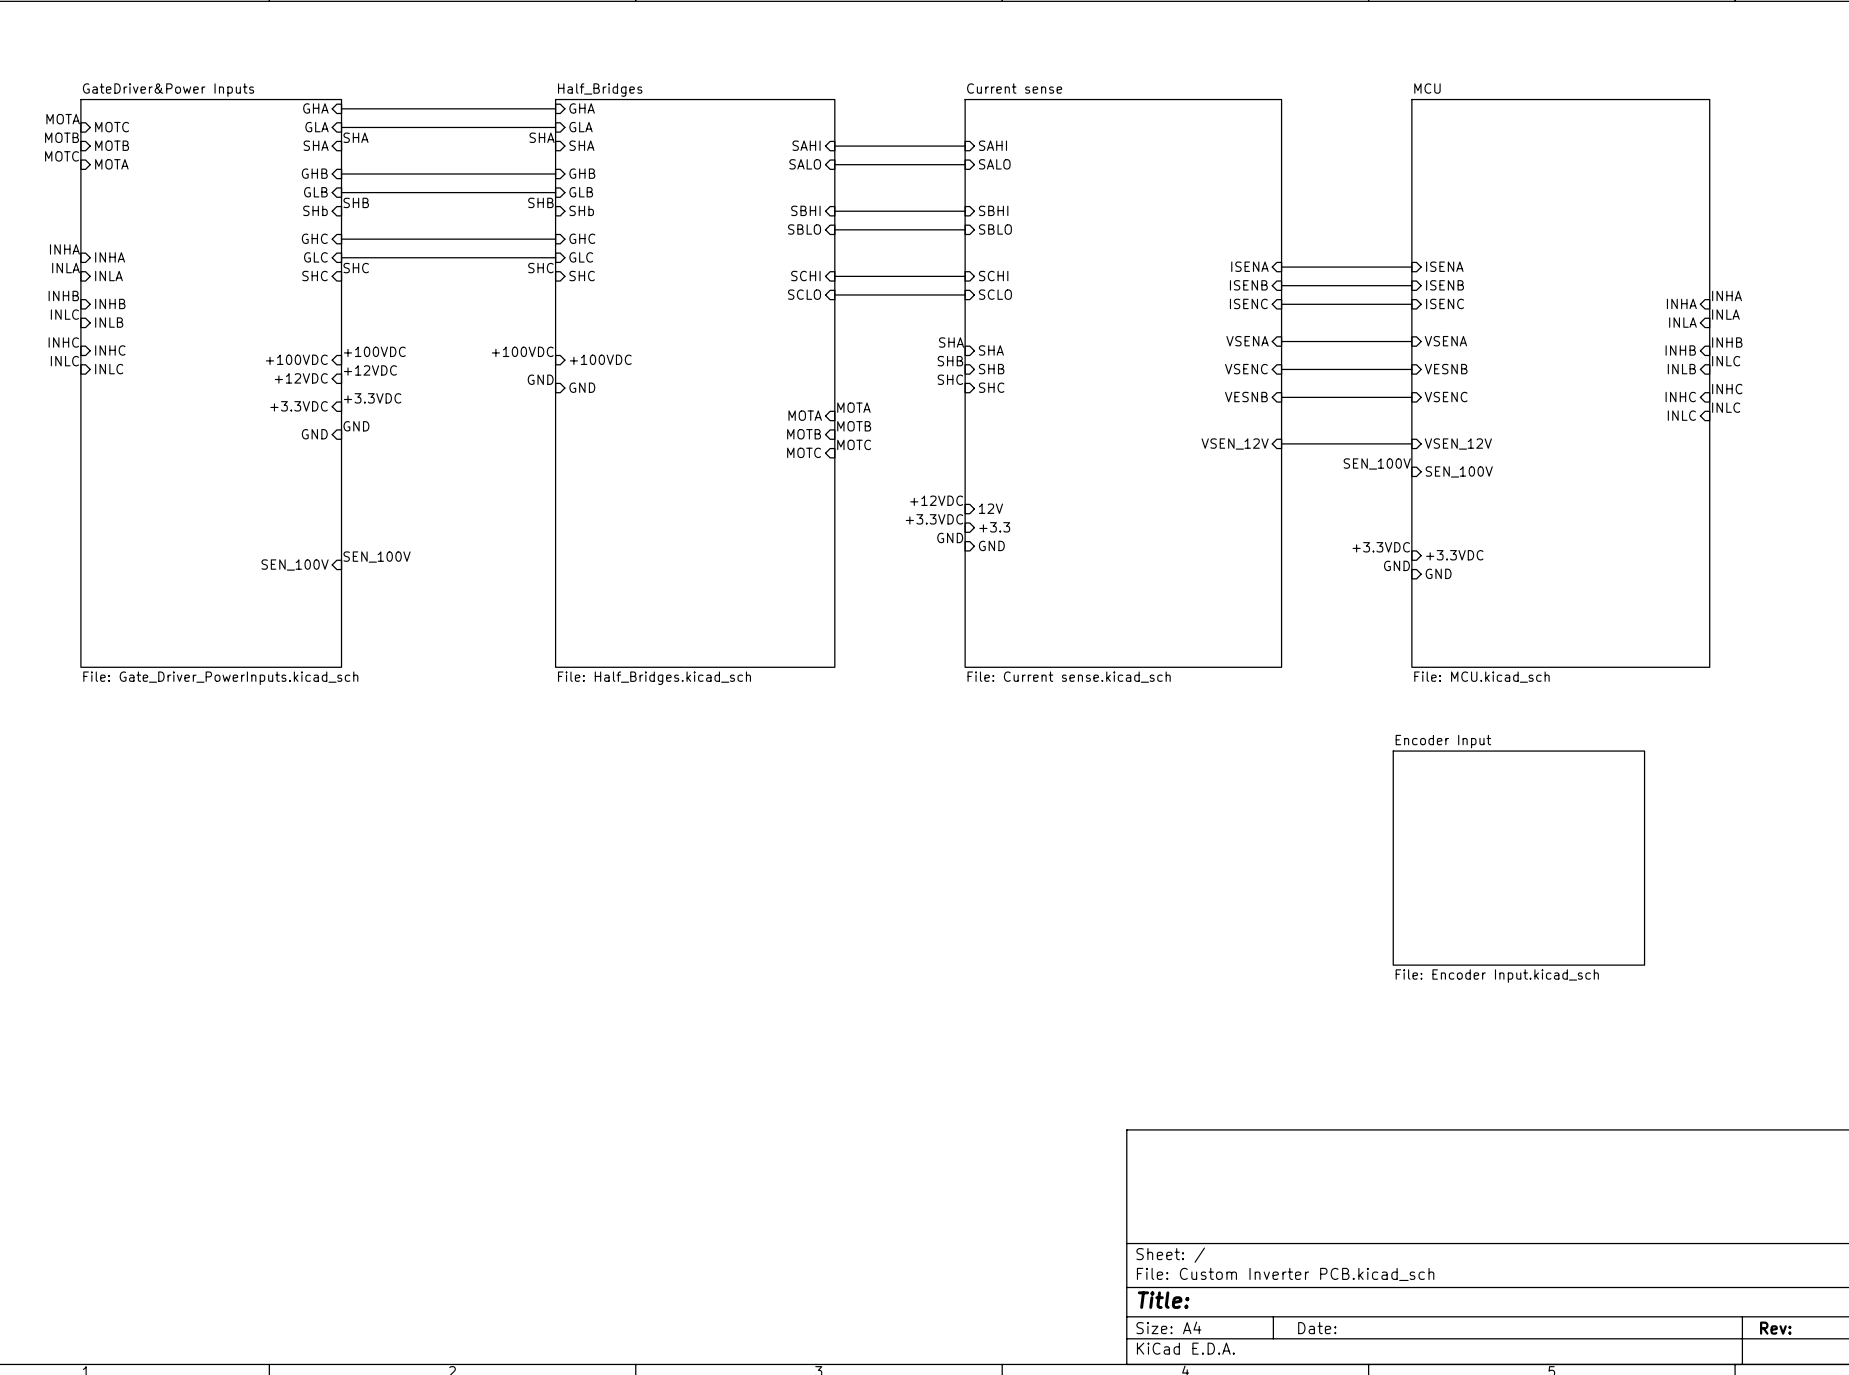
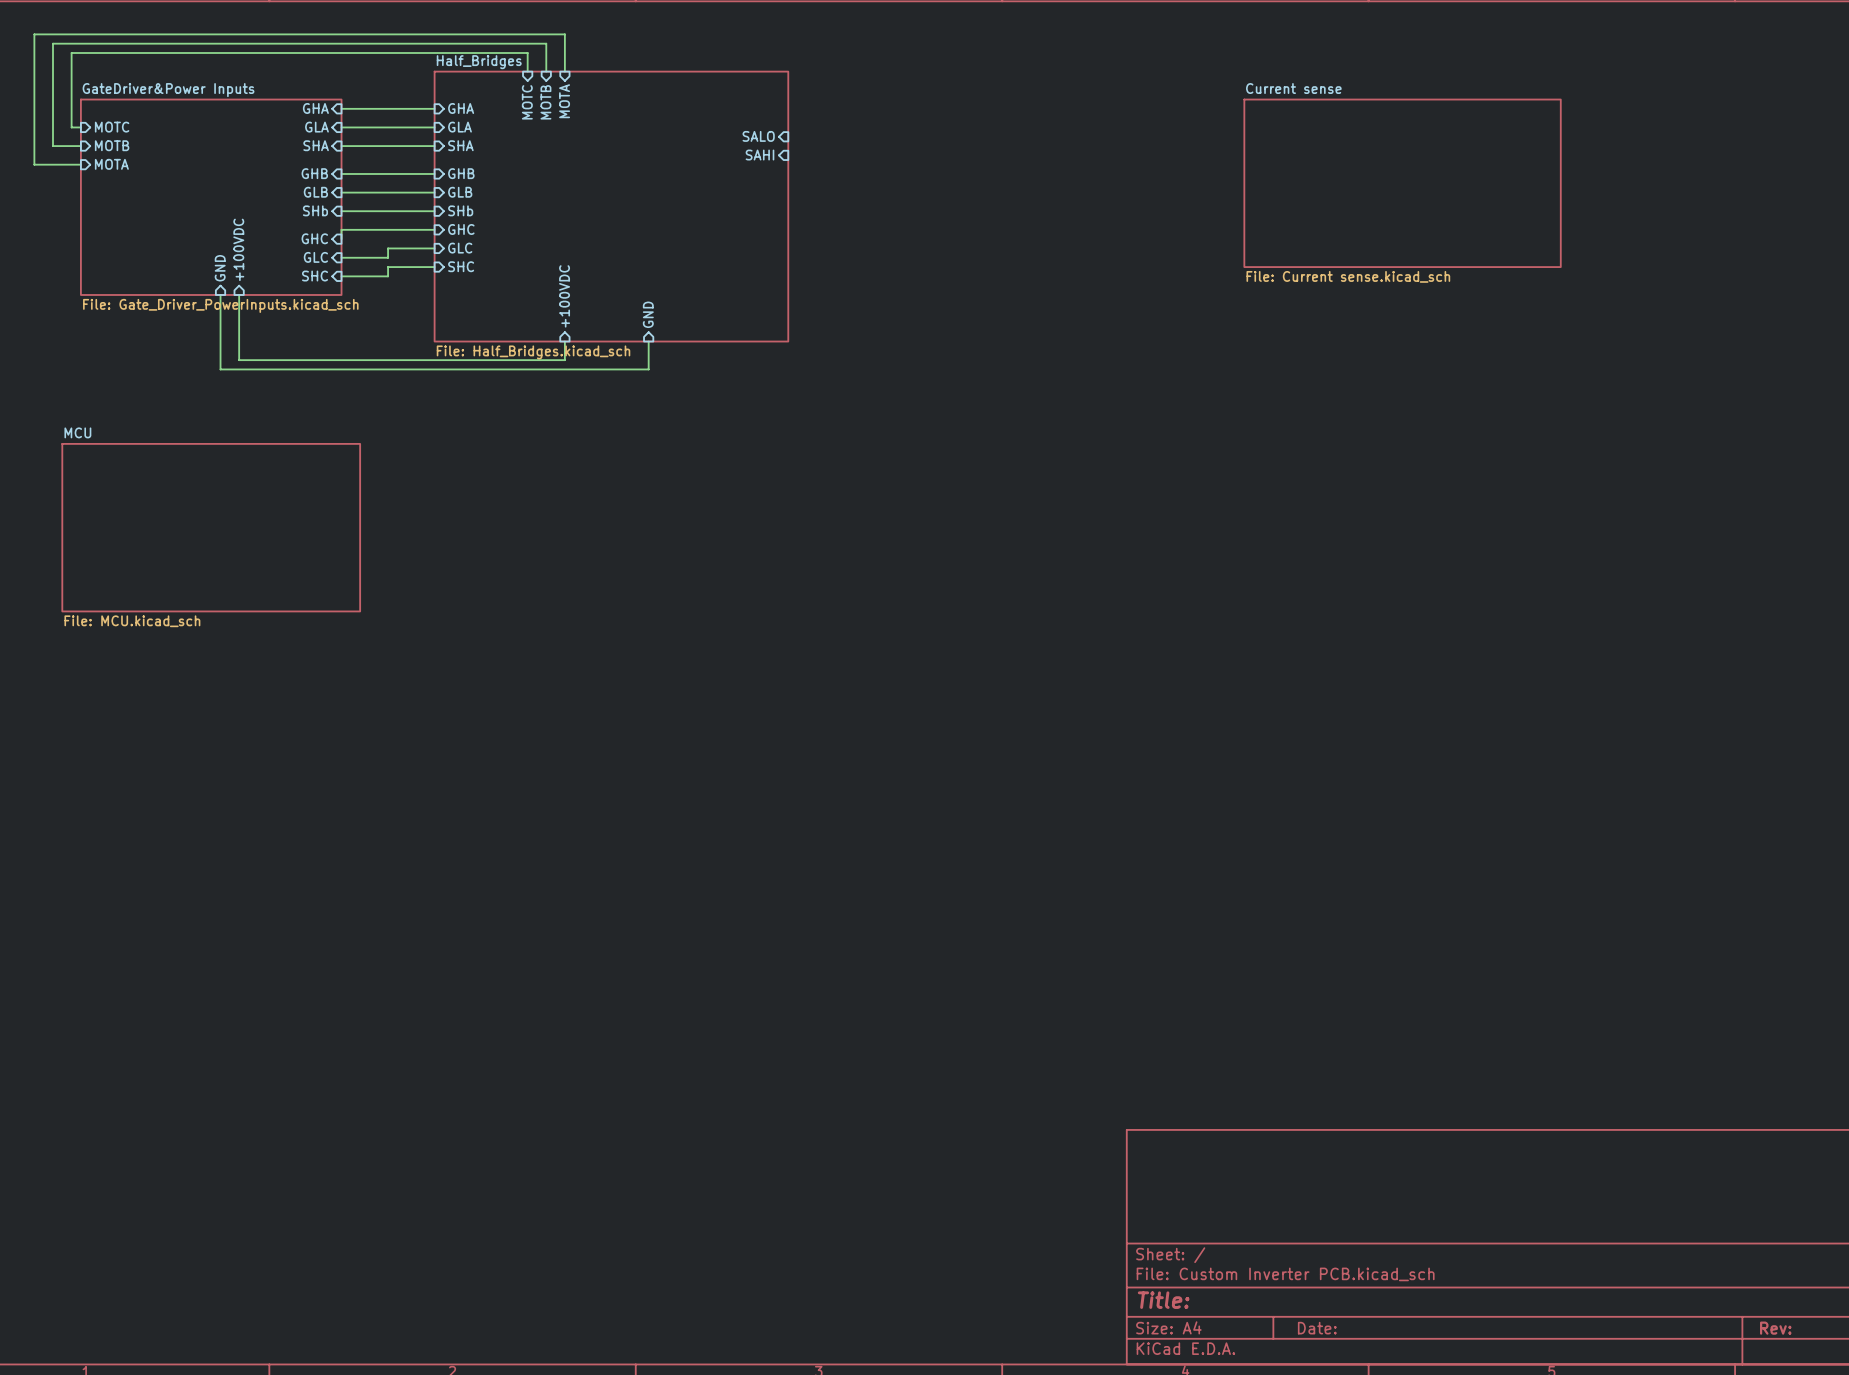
wire: none -> (527, 71) (527, 52) (71, 52) (71, 127) (80, 127)
wire: none -> (546, 71) (546, 43) (52, 43) (52, 146) (80, 146)
wire: none -> (564, 71) (564, 34) (34, 34) (34, 164) (80, 164)
sheet pin: none -> MOTA (564, 101)
sheet pin: none -> MOTC (527, 102)
sheet pin: none -> MOTB (545, 102)
wire: (434, 108) (555, 108) -> none
sheet pin position: GHA (582, 108) -> GHA (461, 108)
label: MOTA (63, 119) -> none
wire: (434, 127) (555, 127) -> none
sheet pin position: GLA (581, 127) -> GLA (460, 127)
label: MOTB (62, 137) -> none
label: SHA (356, 137) -> none
label: SHA (542, 137) -> none
sheet pin position: SHA (581, 145) -> SHA (460, 145)
sheet pin position: SAHI (806, 145) -> SAHI (759, 155)
sheet pin: SAHI (992, 145) -> none
wire: none -> (341, 146) (434, 146)
wire: (834, 146) (965, 146) -> none
label: MOTC (62, 156) -> none
sheet pin position: SALO (805, 164) -> SALO (758, 136)
wire: (834, 164) (965, 164) -> none
sheet pin: SALO (994, 164) -> none
wire: (434, 173) (555, 173) -> none
sheet pin position: GHB (582, 173) -> GHB (461, 173)
sheet Current sense: none -> File: Current sense.kicad_sch (1402, 183)
wire: (434, 192) (555, 192) -> none
sheet pin position: GLB (581, 192) -> GLB (460, 192)
sheet GateDriver&Power Inputs: none -> File: Gate_Driver_PowerInputs.kicad_sch (211, 197)
label: SHB (356, 202) -> none
label: SHB (540, 202) -> none
sheet Half_Bridges: none -> File: Half_Bridges.kicad_sch (611, 206)
sheet pin position: SHb (581, 210) -> SHb (460, 210)
sheet pin: SBHI (805, 210) -> none
sheet pin: SBHI (993, 210) -> none
wire: none -> (341, 211) (434, 211)
wire: (834, 211) (965, 211) -> none
sheet pin: SBLO (804, 229) -> none
wire: (834, 229) (965, 229) -> none
sheet pin: SBLO (995, 229) -> none
sheet pin position: GHC (582, 238) -> GHC (461, 229)
wire: (341, 239) (555, 239) -> (341, 239) (341, 229) (434, 229)
label: INHA (64, 249) -> none
sheet pin: none -> +100VDC (238, 249)
sheet pin: INHA (110, 257) -> none
wire: (388, 257) (555, 257) -> (388, 257) (388, 248) (434, 248)
sheet pin position: GLC (581, 257) -> GLC (460, 248)
sheet pin: ISENA (1249, 266) -> none
sheet pin: ISENA (1444, 266) -> none
wire: none -> (434, 267) (388, 267) (388, 276) (341, 276)
label: INLA (66, 268) -> none
sheet pin: none -> GND (220, 268)
label: SHC (356, 268) -> none
label: SHC (540, 268) -> none
sheet pin: INLA (108, 276) -> none
sheet pin position: SHC (582, 276) -> SHC (461, 266)
sheet pin: SCHI (805, 276) -> none
wire: (834, 276) (965, 276) -> none
sheet pin: SCHI (993, 276) -> none
sheet pin: ISENB (1248, 285) -> none
wire: (1281, 285) (1411, 285) -> none
sheet pin: ISENB (1445, 285) -> none
wire: none -> (220, 294) (220, 369) (648, 369) (648, 341)
wire: none -> (239, 294) (239, 360) (564, 360) (564, 341)
sheet pin: SCLO (804, 294) -> none
wire: (834, 294) (965, 294) -> none
sheet pin: SCLO (995, 294) -> none
label: INHB (63, 295) -> none
label: INHA (1727, 295) -> none
sheet pin: INHB (110, 303) -> none
sheet pin: ISENC (1248, 303) -> none
sheet pin: ISENC (1445, 303) -> none
sheet pin: INHA (1681, 303) -> none
wire: (1281, 304) (1411, 304) -> none
label: INLC (64, 314) -> none
label: INLA (1725, 314) -> none
sheet pin: INLB (109, 322) -> none
sheet pin: INLA (1682, 322) -> none
sheet pin: VSENA (1247, 341) -> none
wire: (1281, 341) (1411, 341) -> none
sheet pin: VSENA (1445, 341) -> none
label: INHC (63, 342) -> none
label: SHA (951, 342) -> none
label: INHB (1727, 342) -> none
sheet pin: INHC (110, 350) -> none
sheet pin: SHA (991, 350) -> none
sheet pin: INHB (1680, 350) -> none
label: +100VDC (374, 351) -> none
label: +100VDC (522, 351) -> none
sheet pin: +100VDC (296, 359) -> none
sheet pin rotation: 0° (600, 359) -> 90° counterclockwise (564, 296)
sheet pin position: +100VDC (600, 359) -> +100VDC (564, 296)
label: INLC (64, 361) -> none
label: SHB (950, 361) -> none
label: INLC (1726, 361) -> none
sheet pin: INLC (109, 369) -> none
sheet pin: SHB (991, 369) -> none
sheet pin: VSENC (1246, 369) -> none
wire: (1281, 369) (1411, 369) -> none
sheet pin: VESNB (1446, 369) -> none
sheet pin: INLB (1681, 369) -> none
label: +12VDC (370, 370) -> none
sheet pin: +12VDC (301, 378) -> none
label: GND (540, 379) -> none
label: SHC (950, 379) -> none
sheet GateDriver&Power Inputs: File: Gate_Driver_PowerInputs.kicad_sch (211, 383) -> none
sheet Half_Bridges: File: Half_Bridges.kicad_sch (695, 383) -> none
sheet Current sense: File: Current sense.kicad_sch (1123, 383) -> none
sheet MCU: File: MCU.kicad_sch (1560, 383) -> none
sheet pin rotation: 0° (582, 387) -> 90° counterclockwise (648, 314)
sheet pin position: GND (582, 387) -> GND (648, 314)
sheet pin: SHC (991, 387) -> none
label: INHC (1727, 389) -> none
sheet pin: VESNB (1246, 397) -> none
wire: (1281, 397) (1411, 397) -> none
sheet pin: VSENC (1446, 397) -> none
sheet pin: INHC (1680, 397) -> none
label: +3.3VDC (372, 398) -> none
sheet pin: +3.3VDC (299, 406) -> none
label: MOTA (853, 407) -> none
label: INLC (1726, 407) -> none
sheet pin: MOTA (805, 415) -> none
sheet pin: INLC (1681, 415) -> none
label: GND (356, 426) -> none
label: MOTB (854, 426) -> none
sheet pin: GND (314, 434) -> none
sheet pin: MOTB (804, 434) -> none
wire: (1281, 443) (1411, 443) -> none
label: MOTC (854, 444) -> none
sheet pin: VSEN_12V (1235, 444) -> none
sheet pin: VSEN_12V (1458, 444) -> none
sheet pin: MOTC (804, 452) -> none
label: SEN_100V (1377, 463) -> none
sheet pin: SEN_100V (1459, 471) -> none
label: +12VDC (936, 500) -> none
sheet pin: 12V (990, 508) -> none
label: +3.3VDC (934, 519) -> none
sheet MCU: none -> File: MCU.kicad_sch (211, 527)
sheet pin: +3.3 (994, 527) -> none
label: GND (950, 537) -> none
sheet pin: GND (991, 545) -> none
label: +3.3VDC (1381, 547) -> none
sheet pin: +3.3VDC (1454, 555) -> none
label: SEN_100V (377, 557) -> none
sheet pin: SEN_100V (295, 564) -> none
label: GND (1396, 565) -> none
sheet pin: GND (1438, 573) -> none
sheet Encoder Input: File: Encoder Input.kicad_sch (1518, 858) -> none

